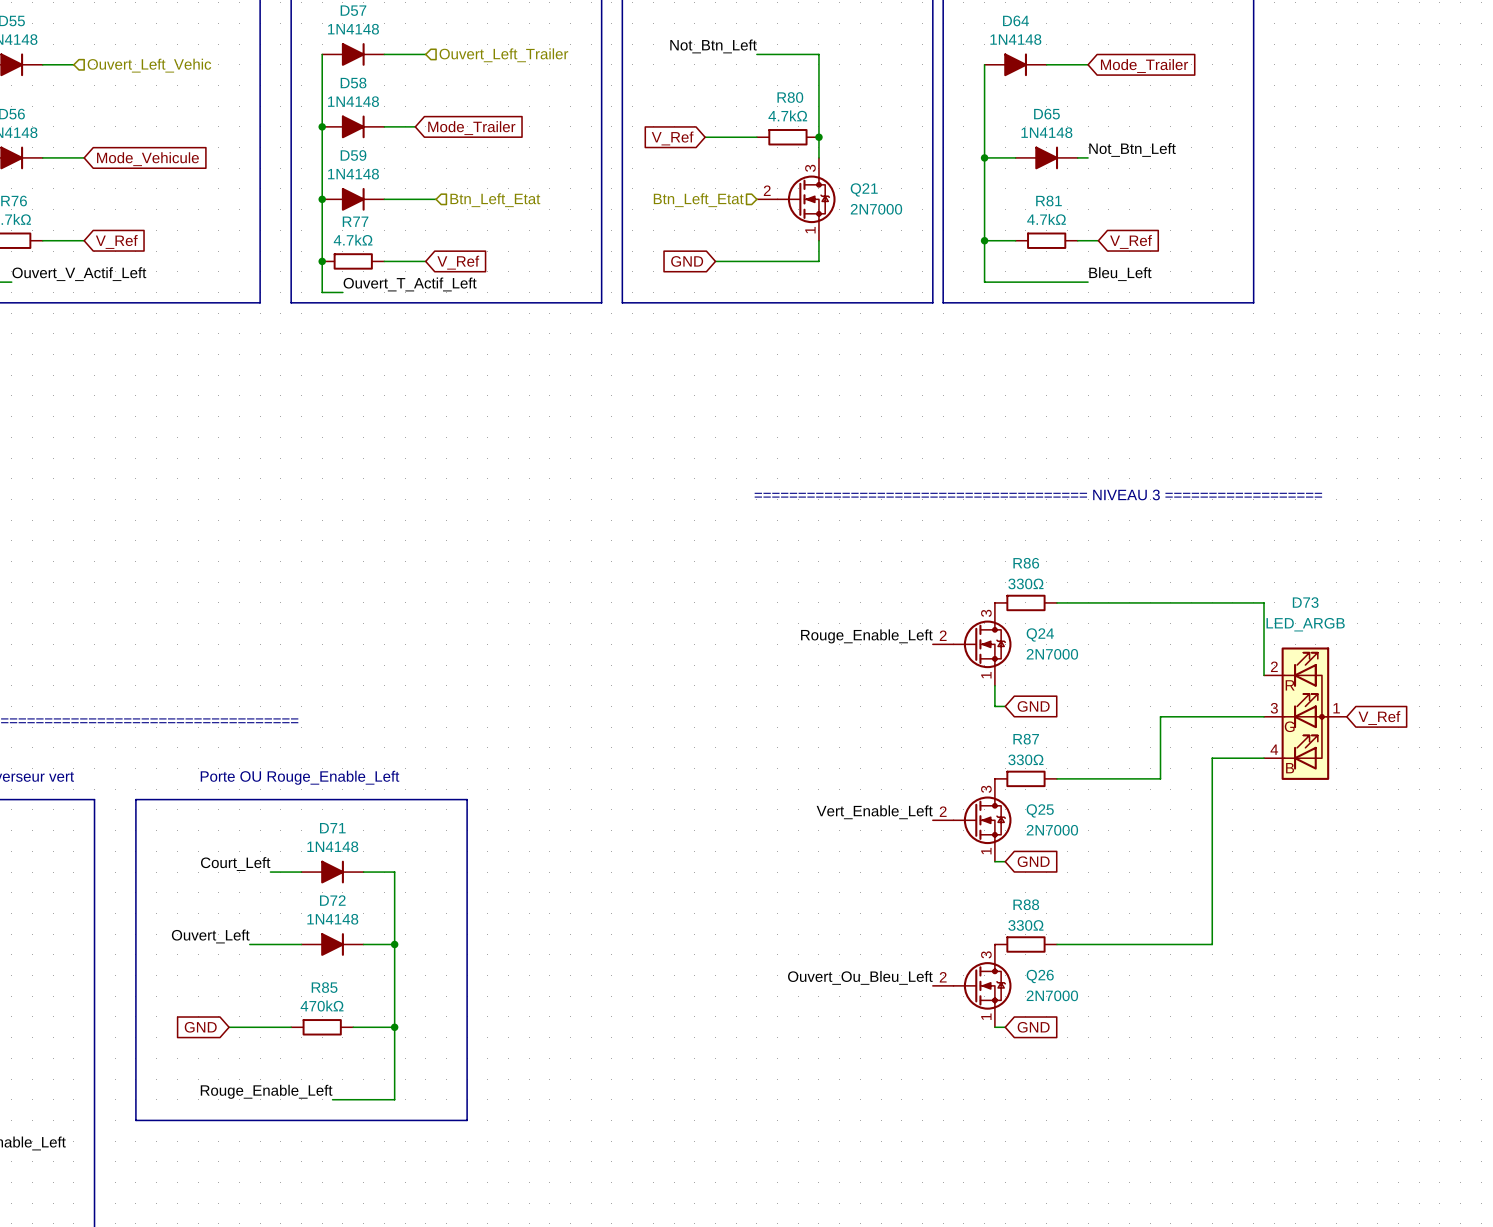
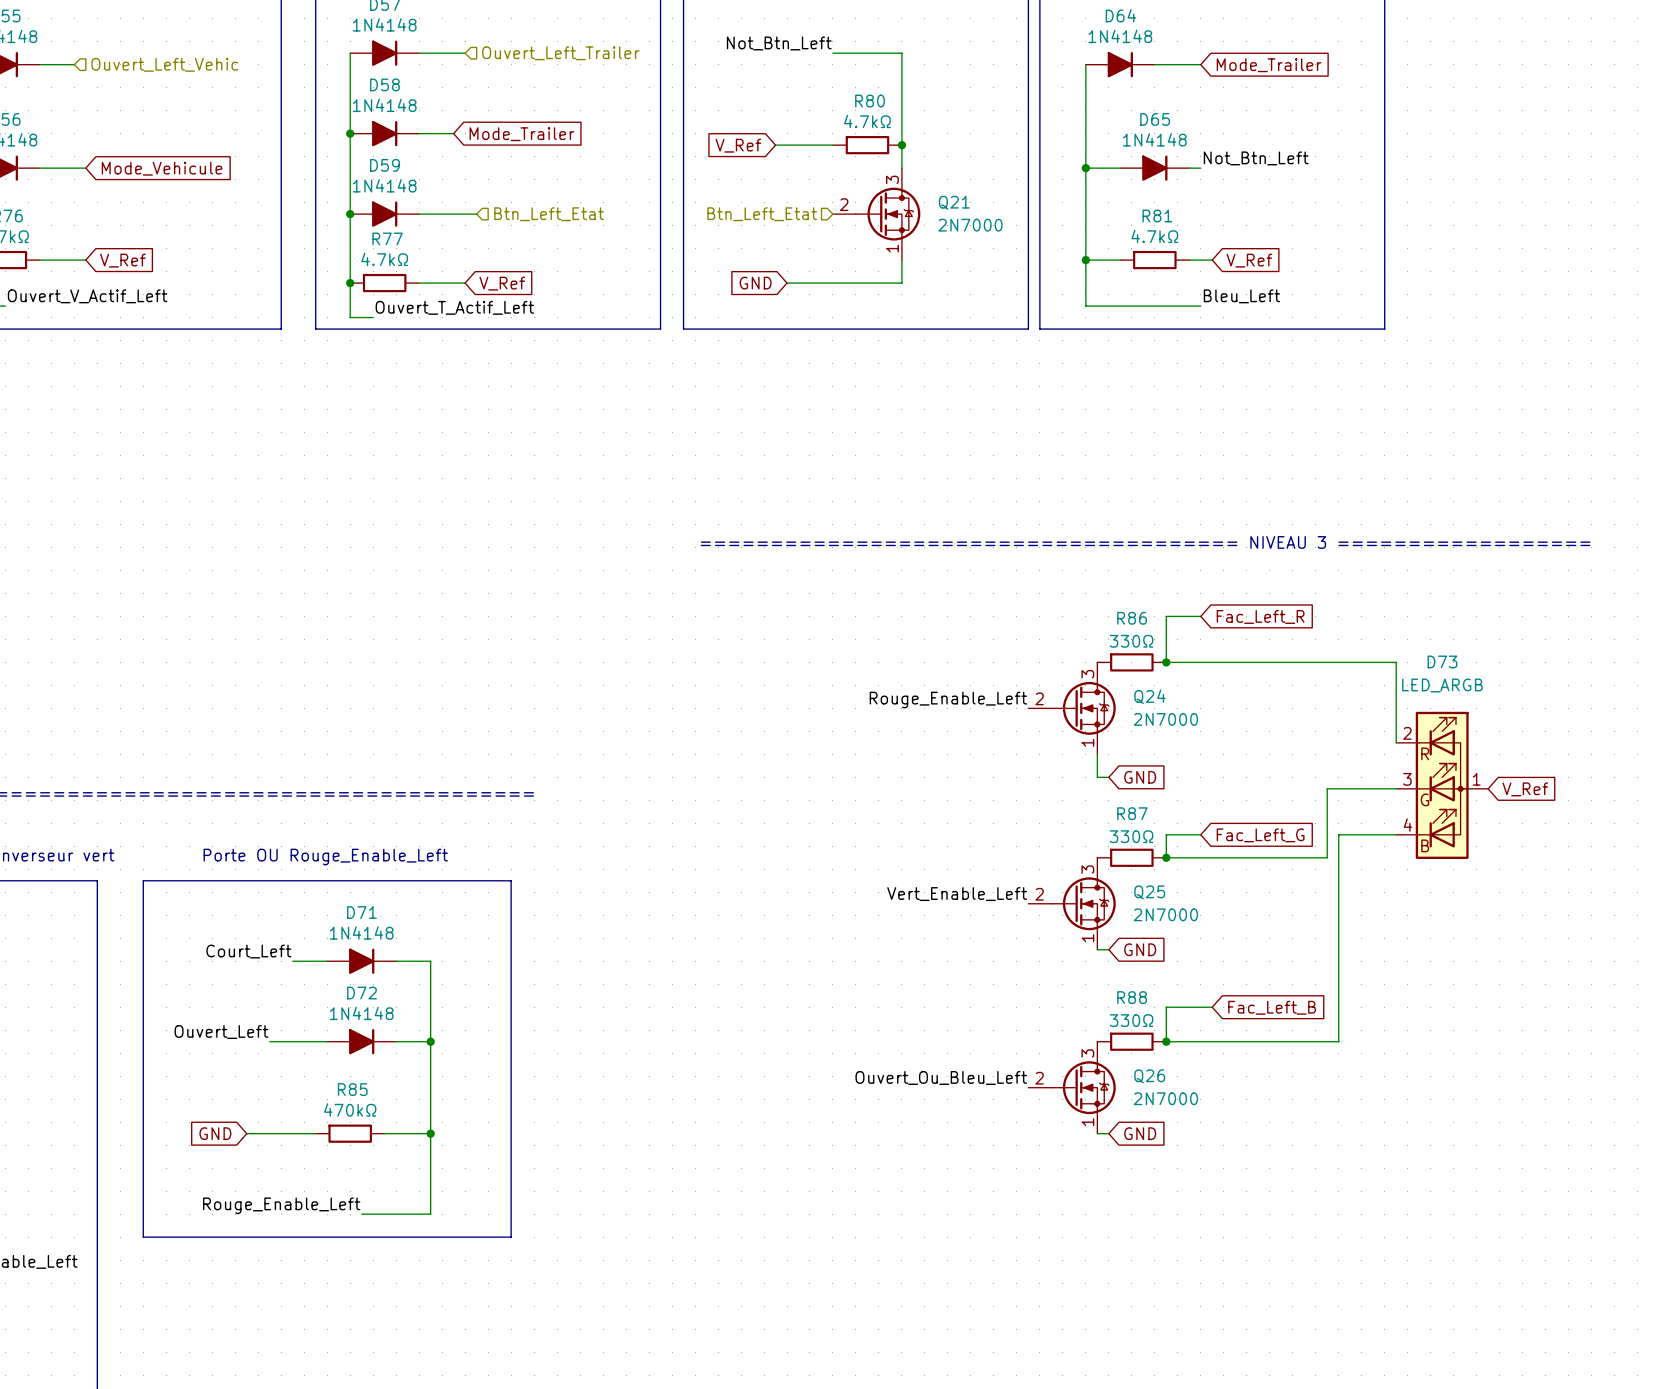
wire: none -> (1200, 616) (1166, 616) (1166, 662)
global label: none -> Fac_Left_R (1260, 616)
junction: none -> (1166, 662)
wire: (1201, 716) (1160, 716) (1160, 778) -> (1327, 788) (1327, 857) (1281, 857)
wire: none -> (1200, 834) (1166, 834) (1166, 857)
global label: none -> Fac_Left_G (1260, 835)
junction: none -> (1166, 857)
wire: none -> (1212, 1007) (1166, 1007) (1166, 1041)
global label: none -> Fac_Left_B (1272, 1007)
junction: none -> (1166, 1041)

